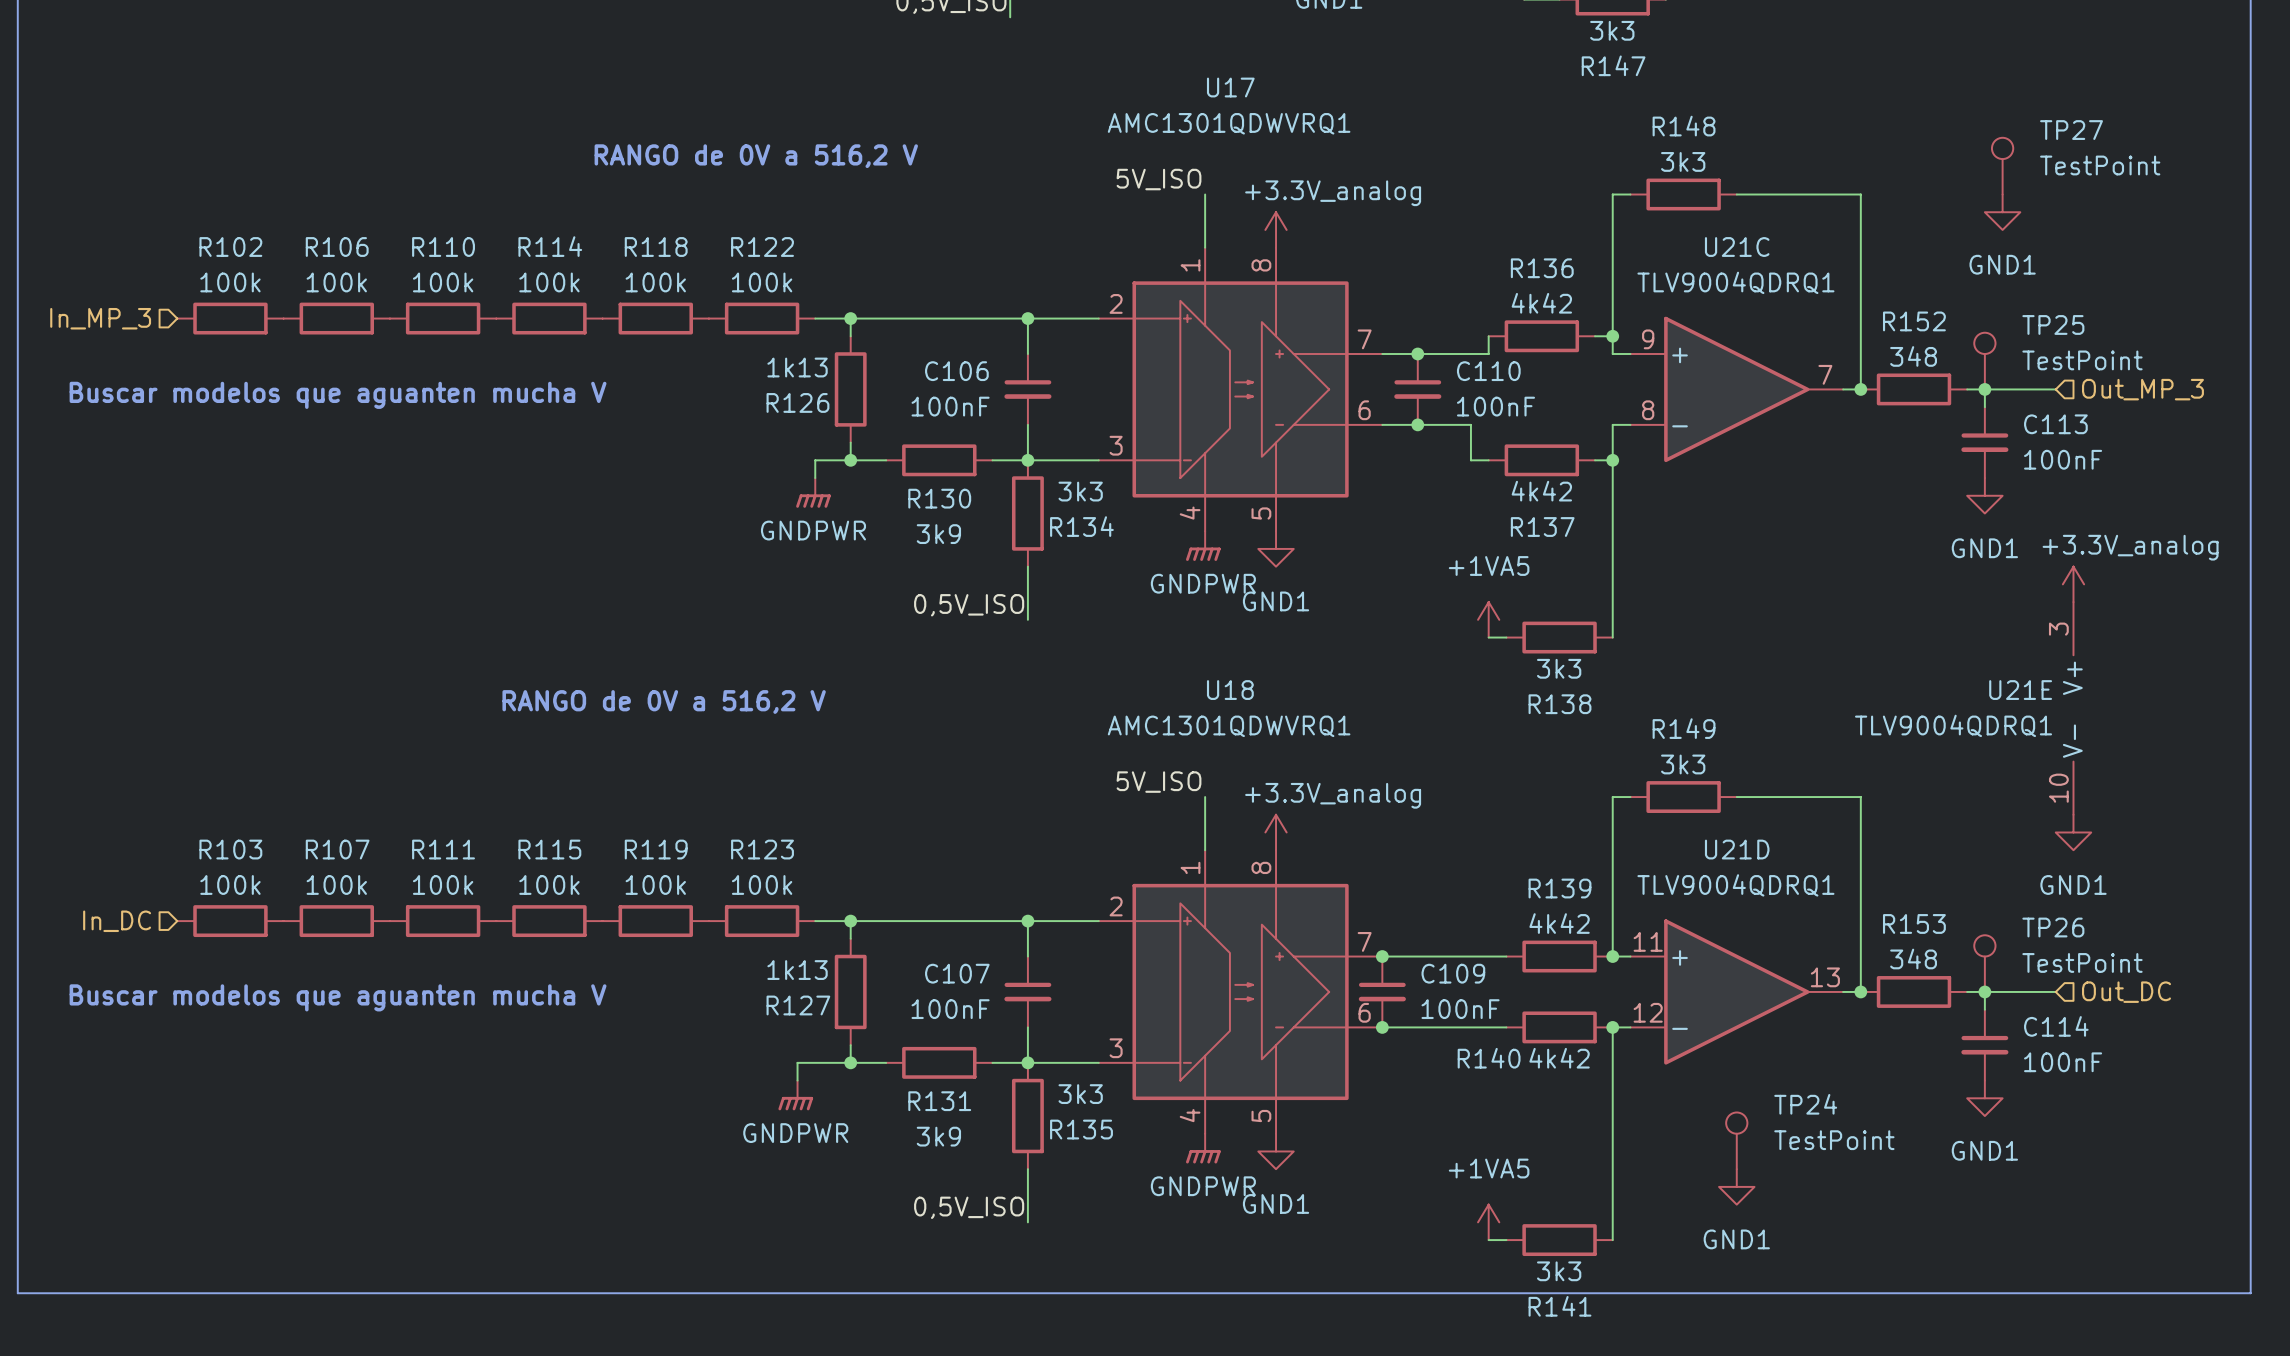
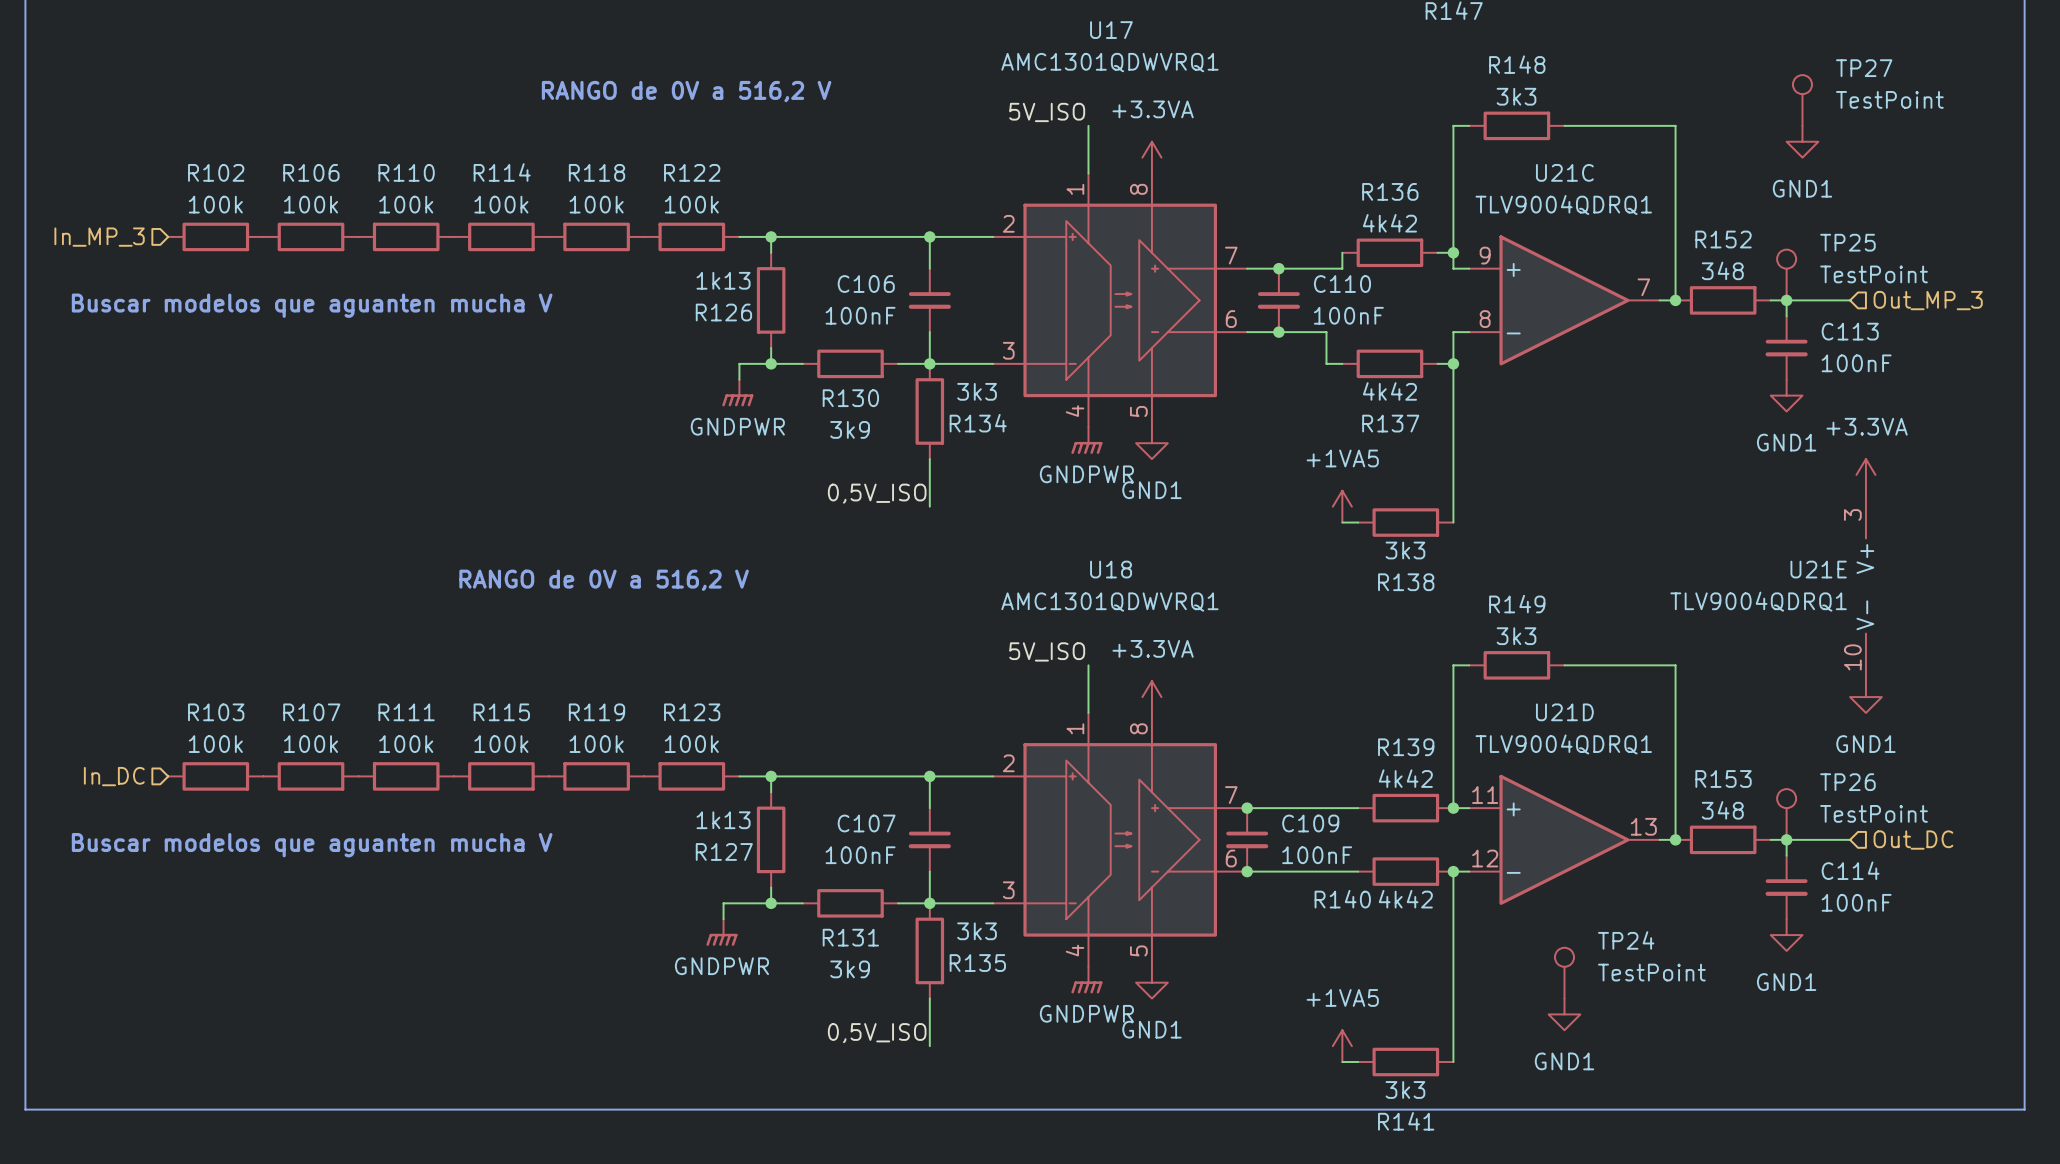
power symbol: +3.3V_analog (1276, 229) -> +3.3VA (1151, 157)
power symbol: +3.3V_analog (2073, 584) -> +3.3VA (1865, 474)
power symbol: +3.3V_analog (1276, 832) -> +3.3VA (1151, 697)

